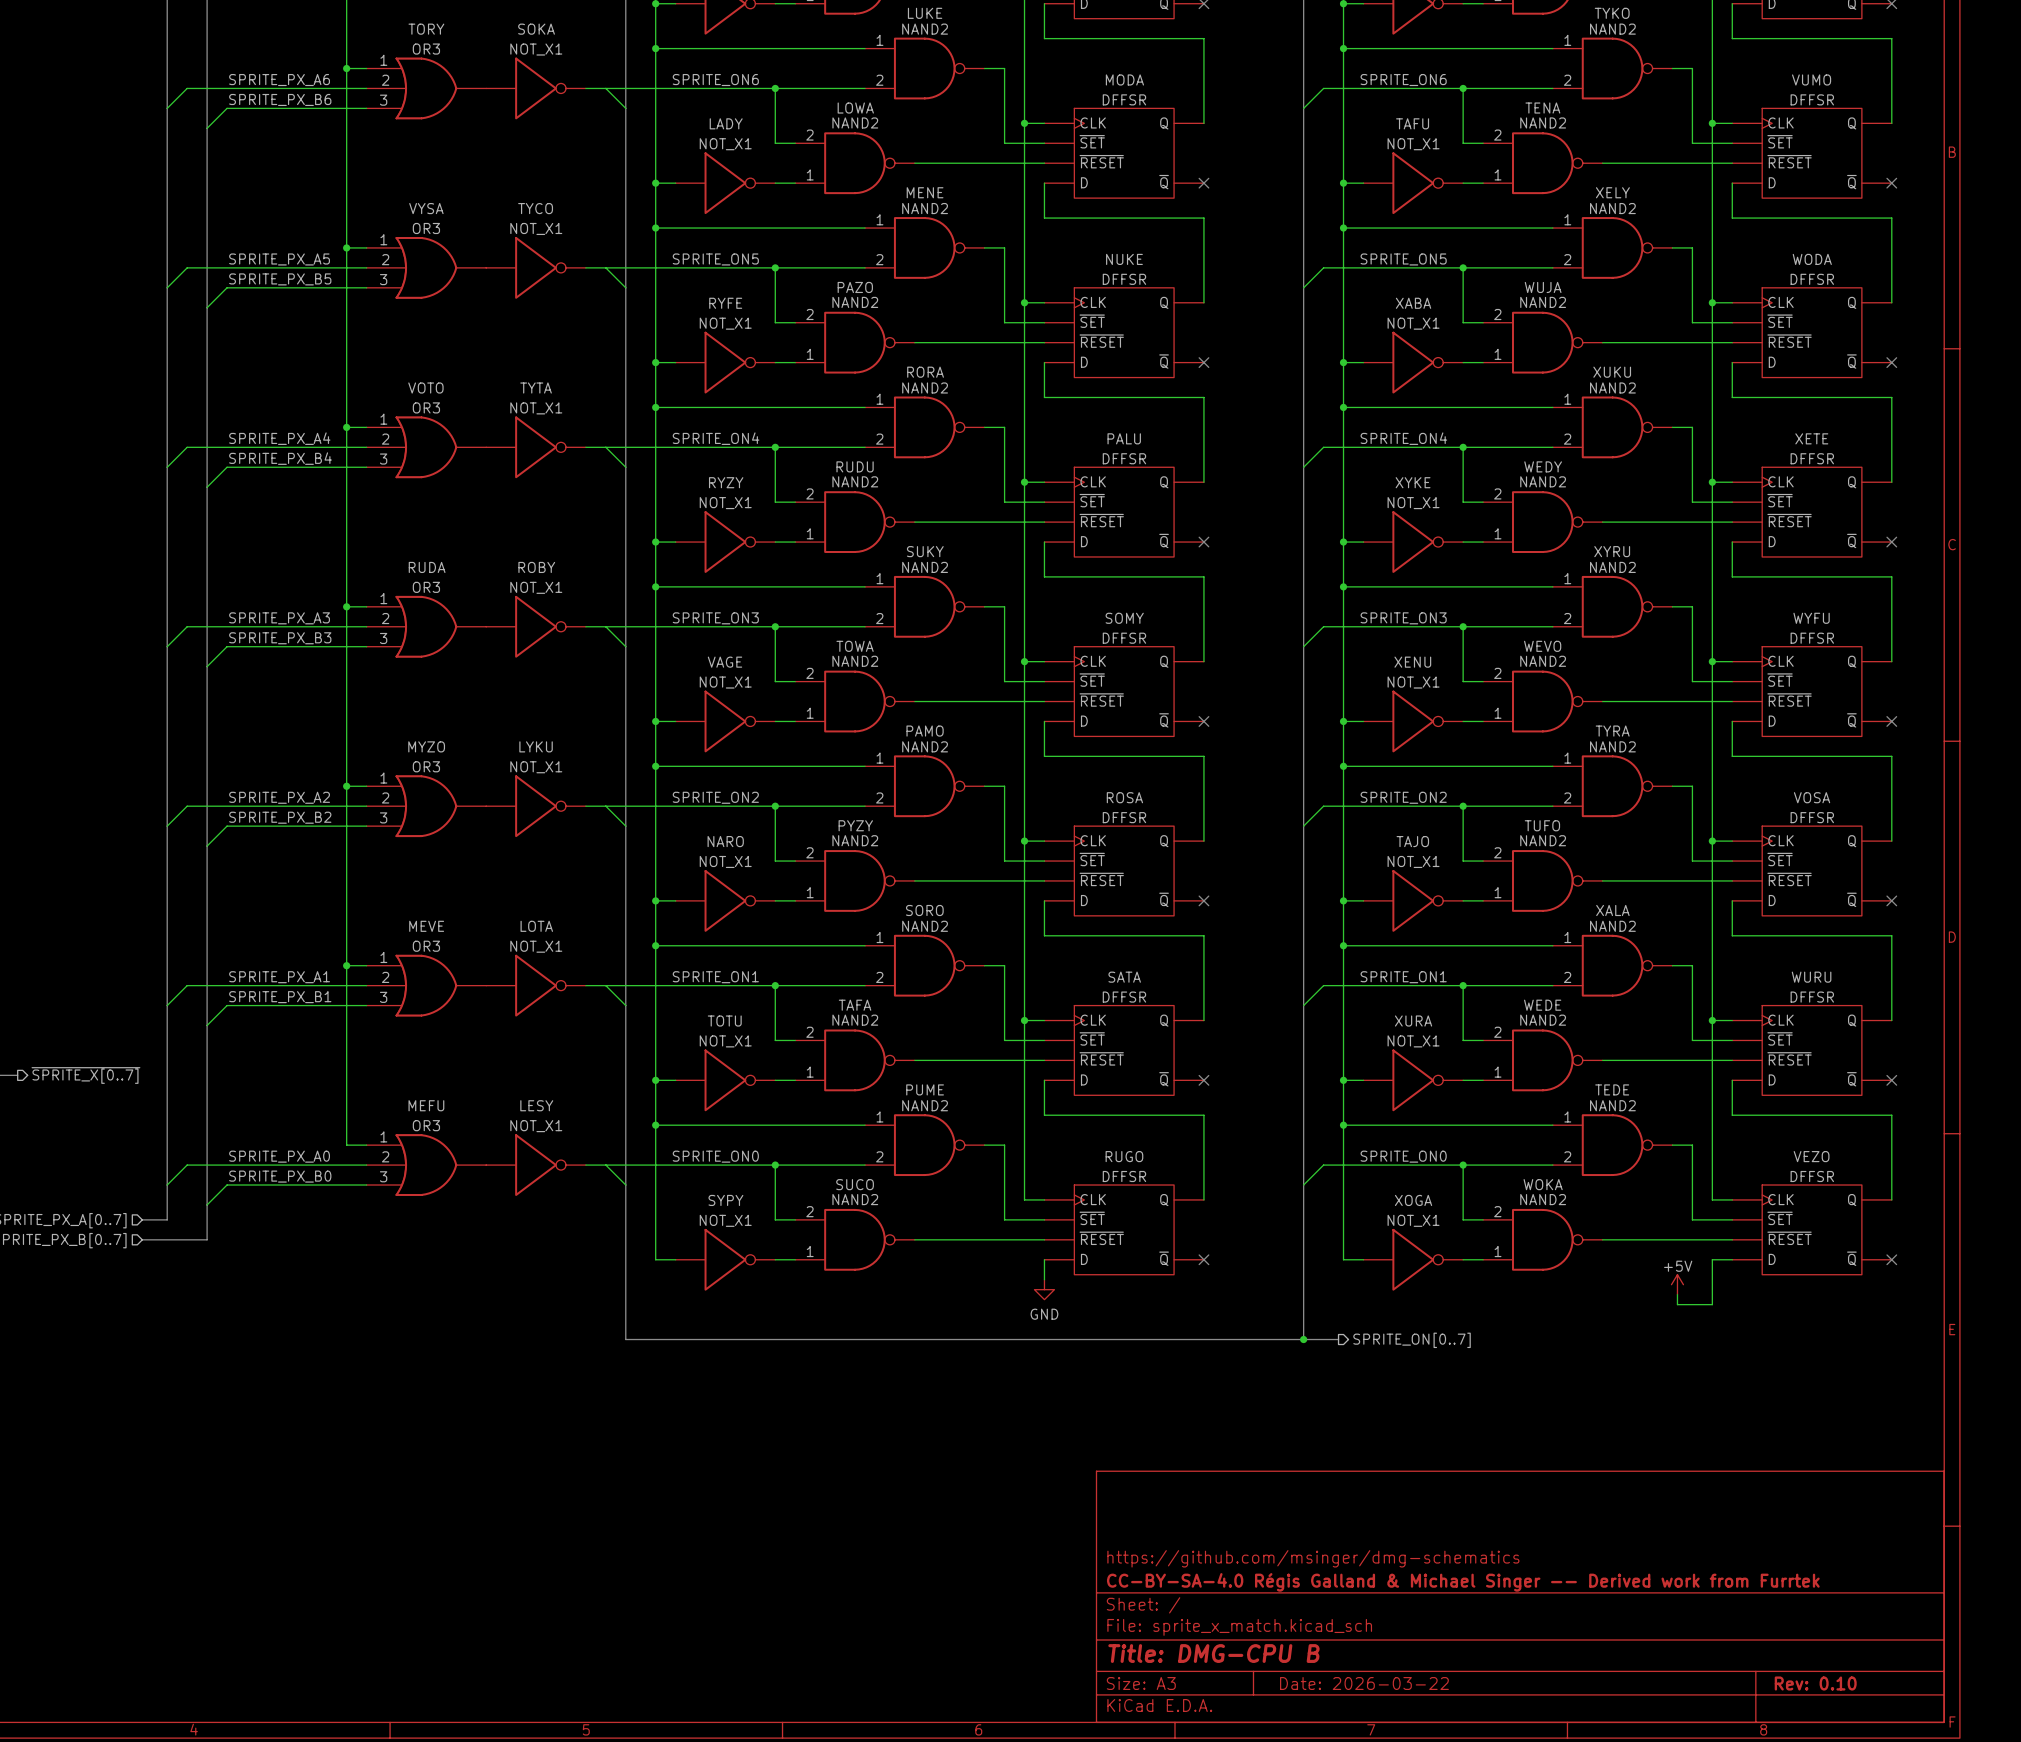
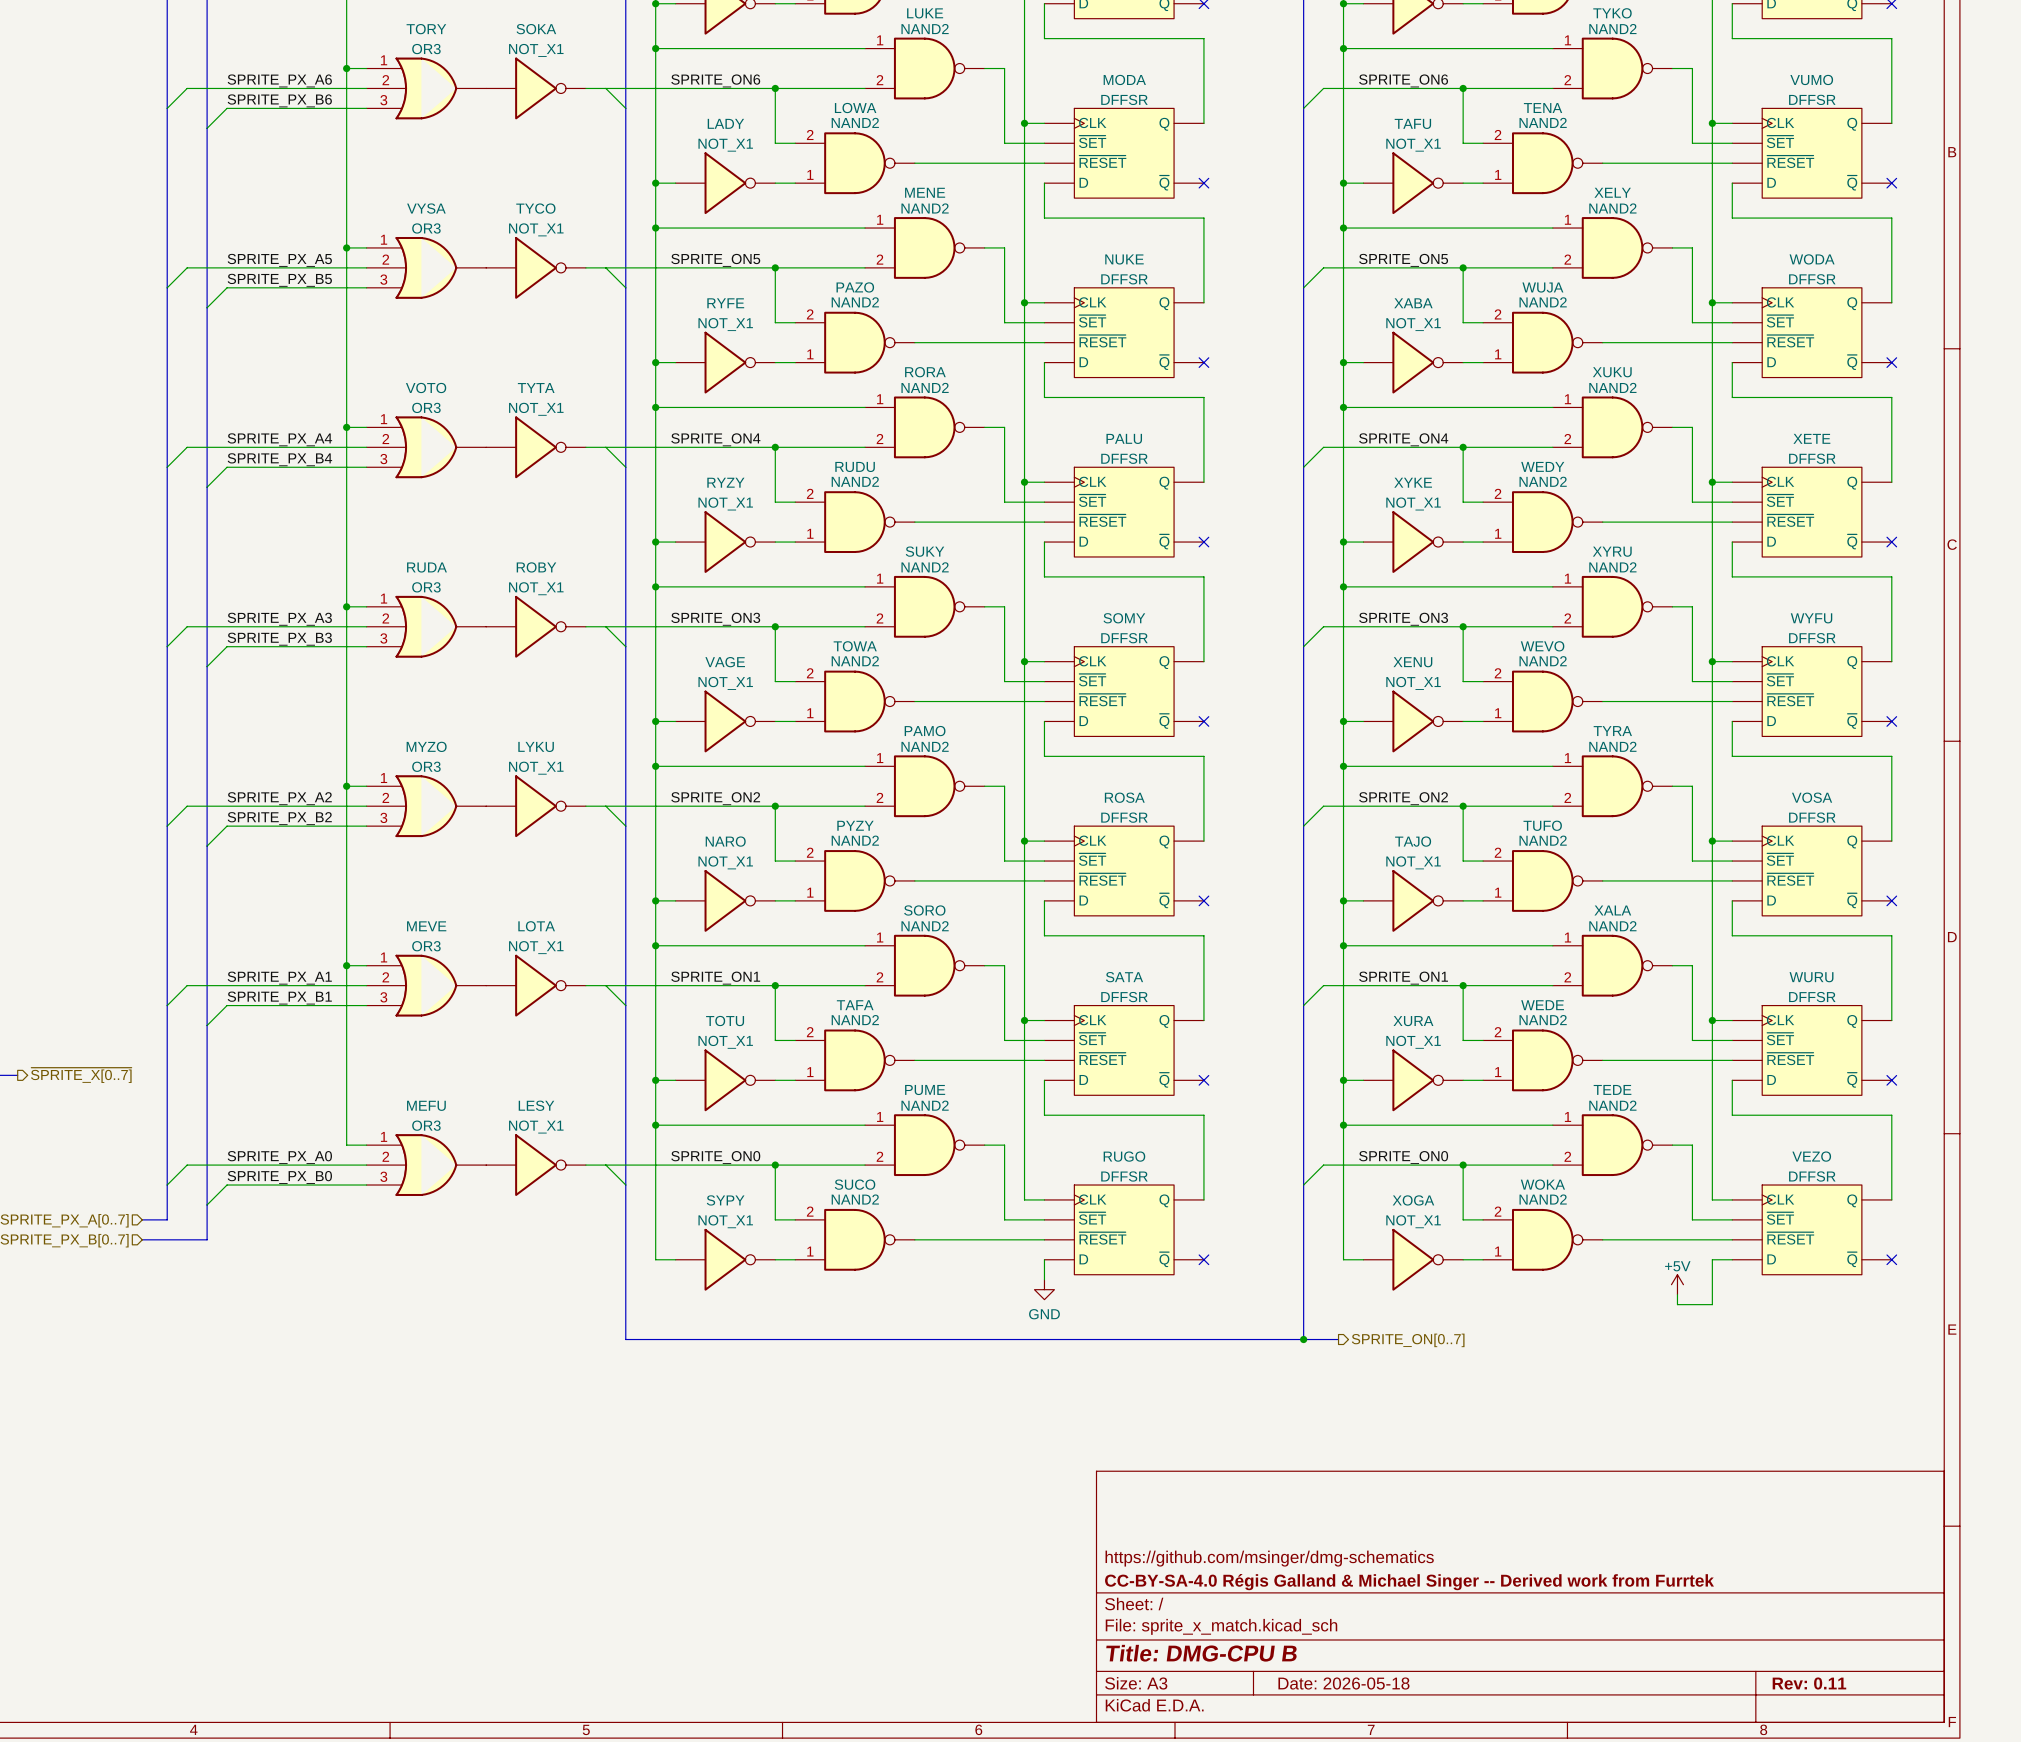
title block: Date: 2026-03-22 (1364, 1683) -> Date: 2026-05-18 (1343, 1683)
title block: Rev: 0.10 (1815, 1683) -> Rev: 0.11 (1809, 1683)

